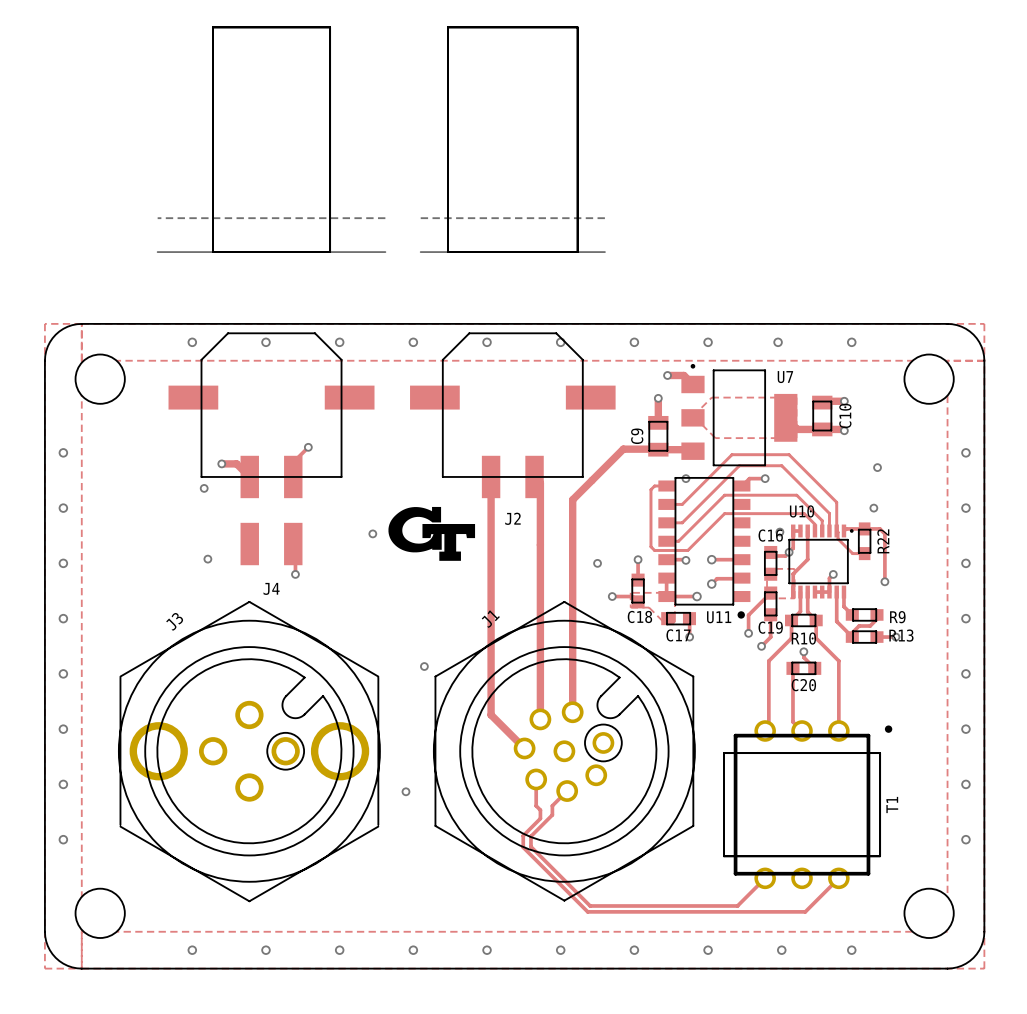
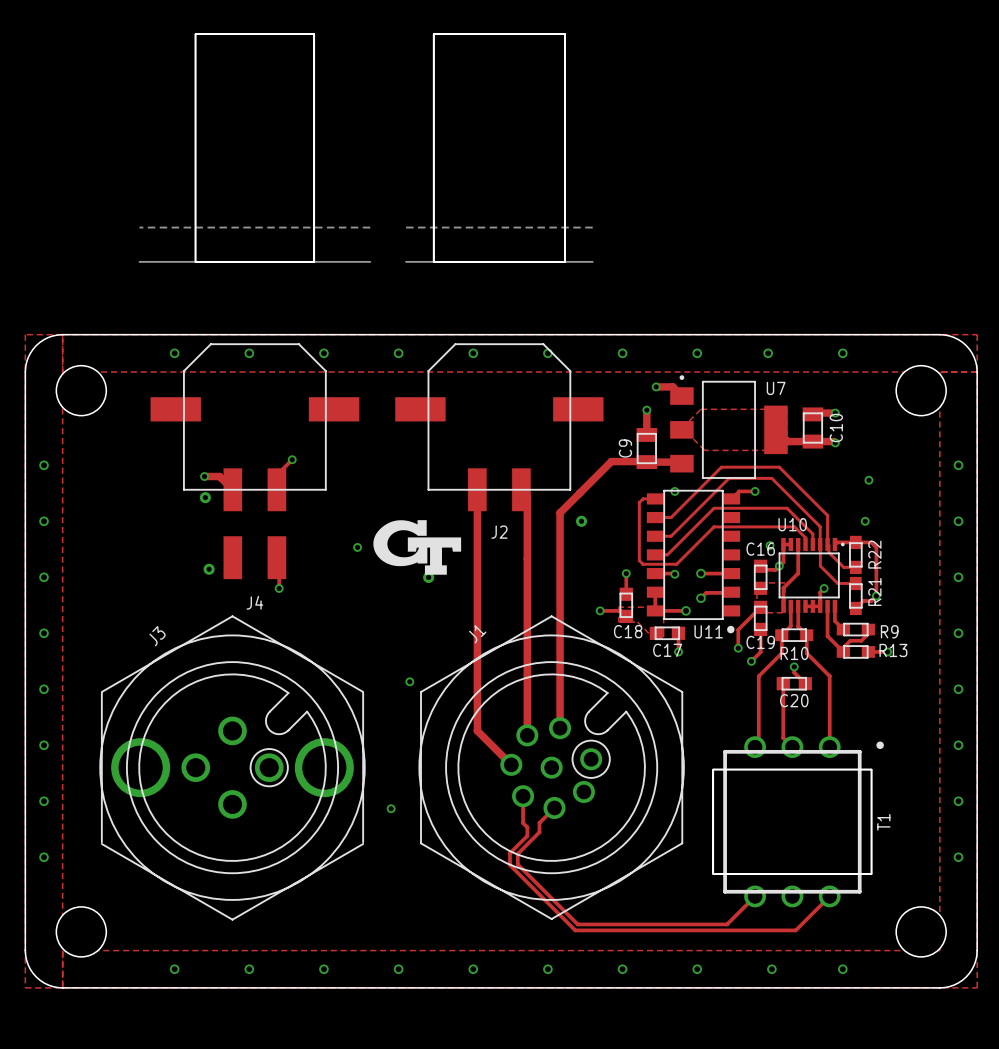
via: none -> (205, 497)
via: (204, 488) -> none
via: none -> (581, 521)
track: none -> (820, 544) (820, 566) (837, 583) (855, 583)
via: none -> (209, 569)
via: (207, 559) -> none
via: none -> (428, 577)
via: (597, 563) -> none
R21: none -> (855, 595)
track: none -> (876, 595) (871, 600) (863, 600) (855, 608)

